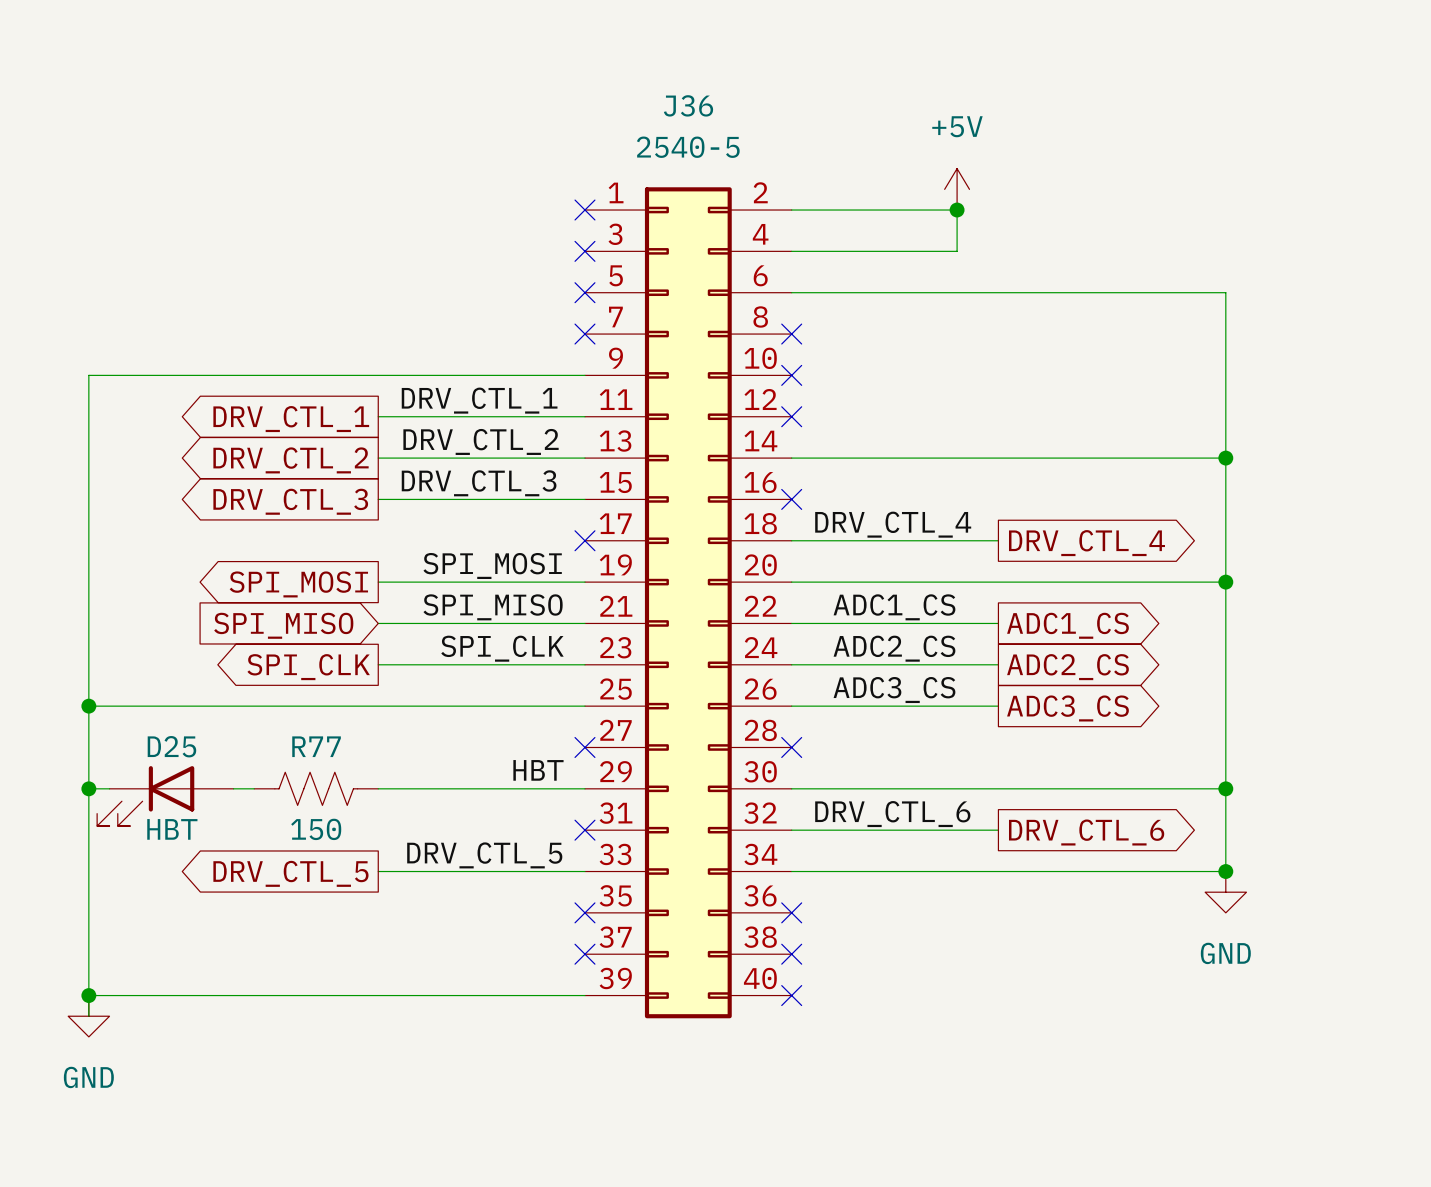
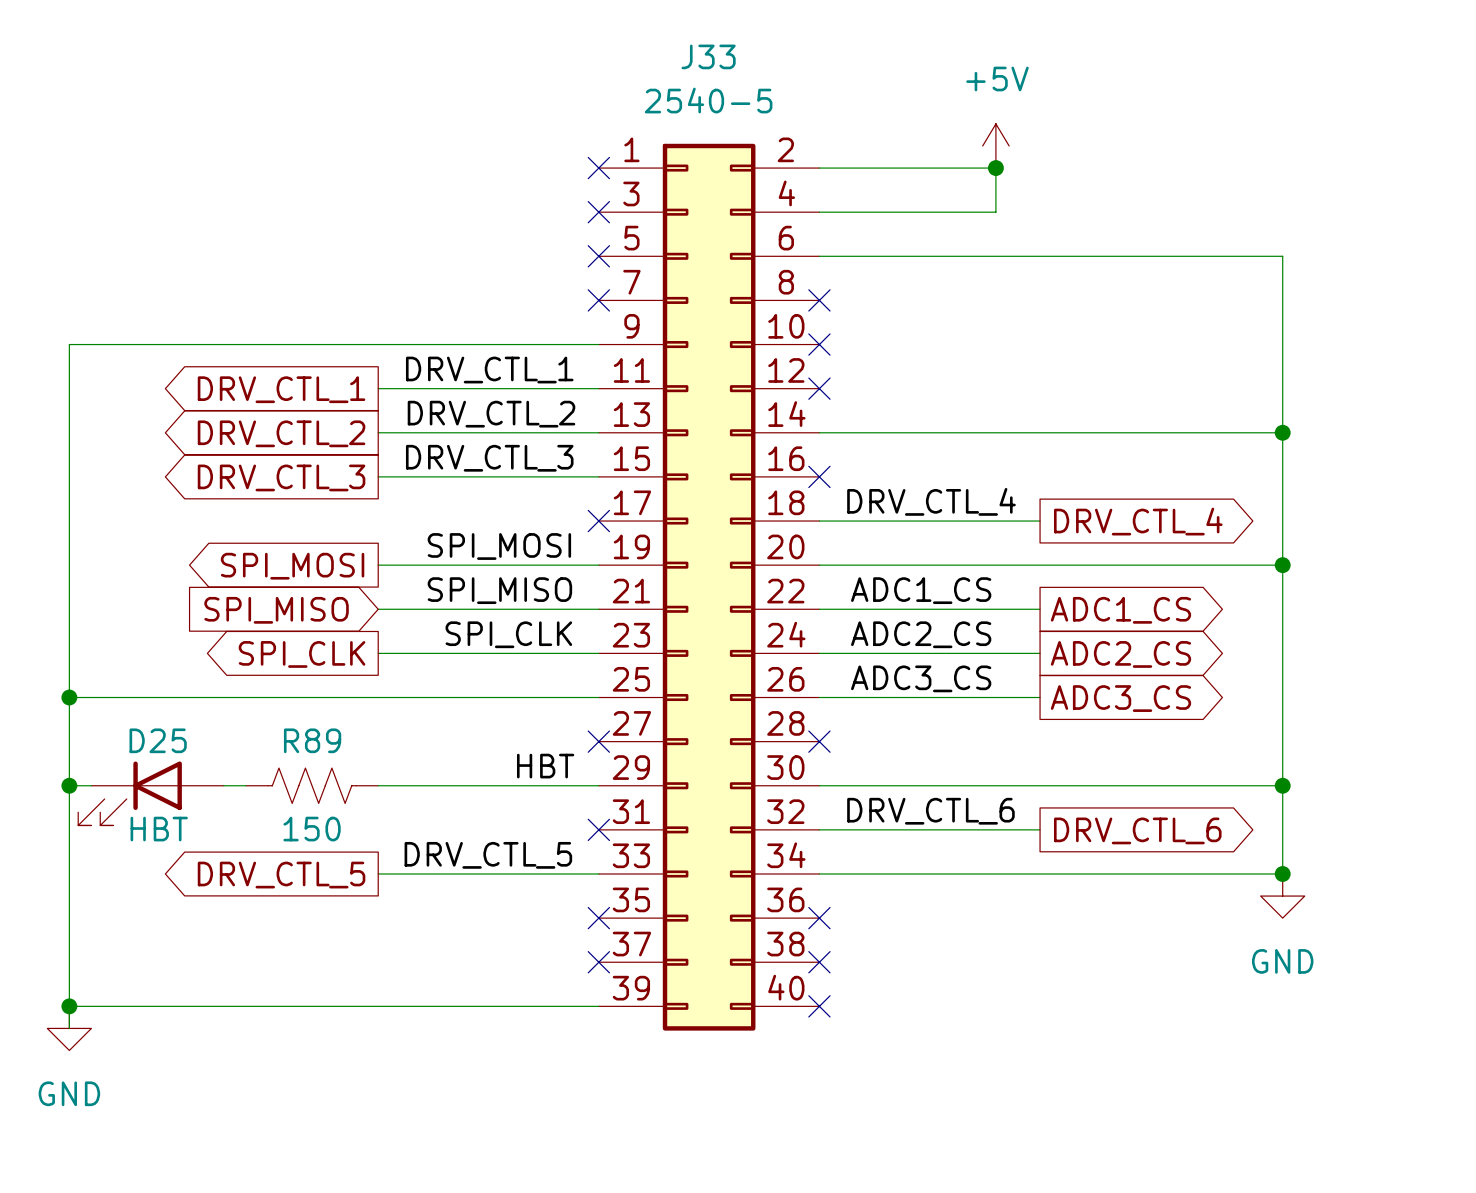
J36 name: J36 (688, 105) -> J33 (708, 56)
R77 name: R77 (316, 746) -> R89 (312, 740)

